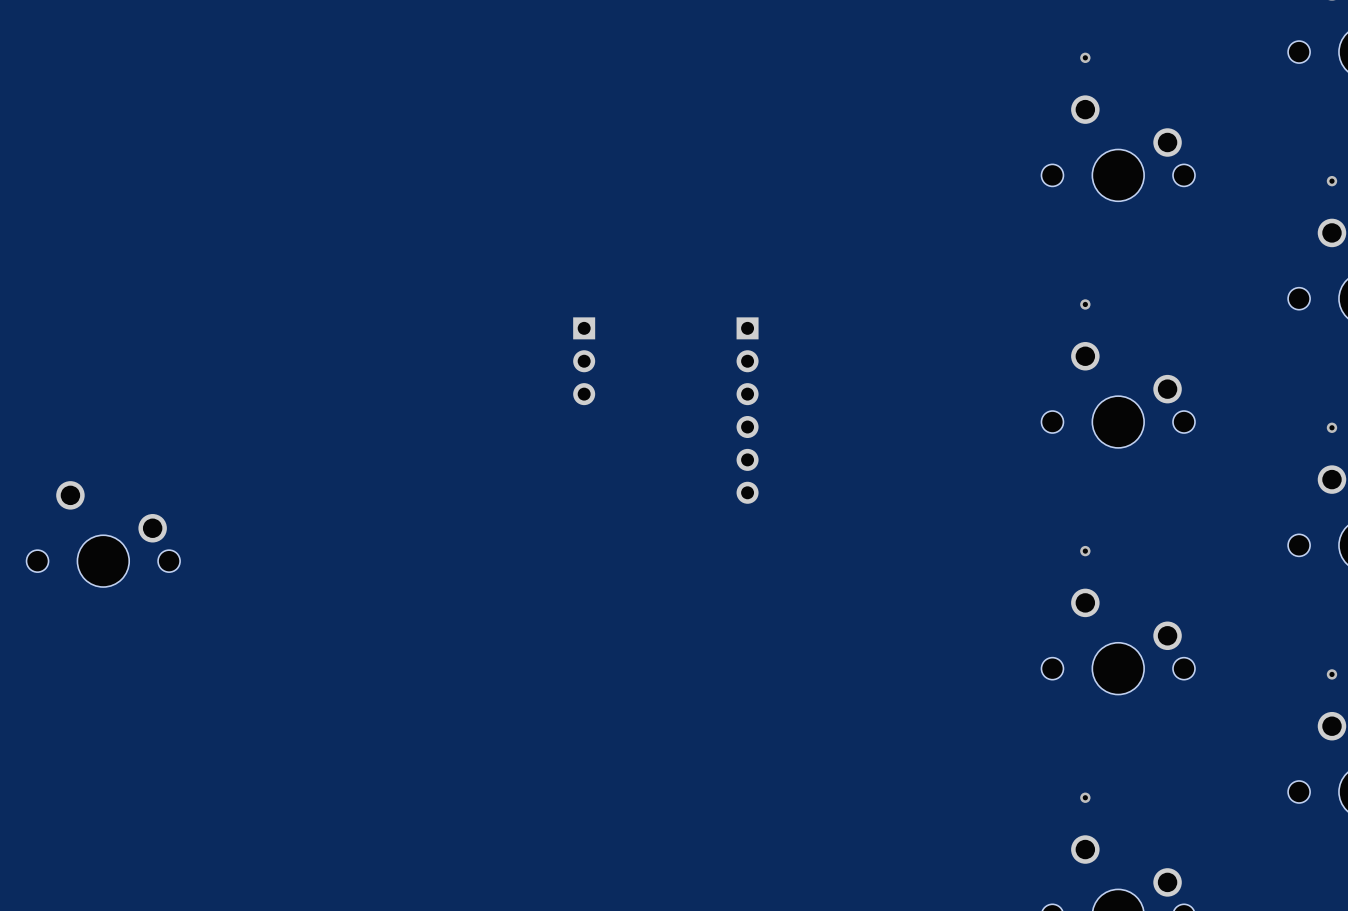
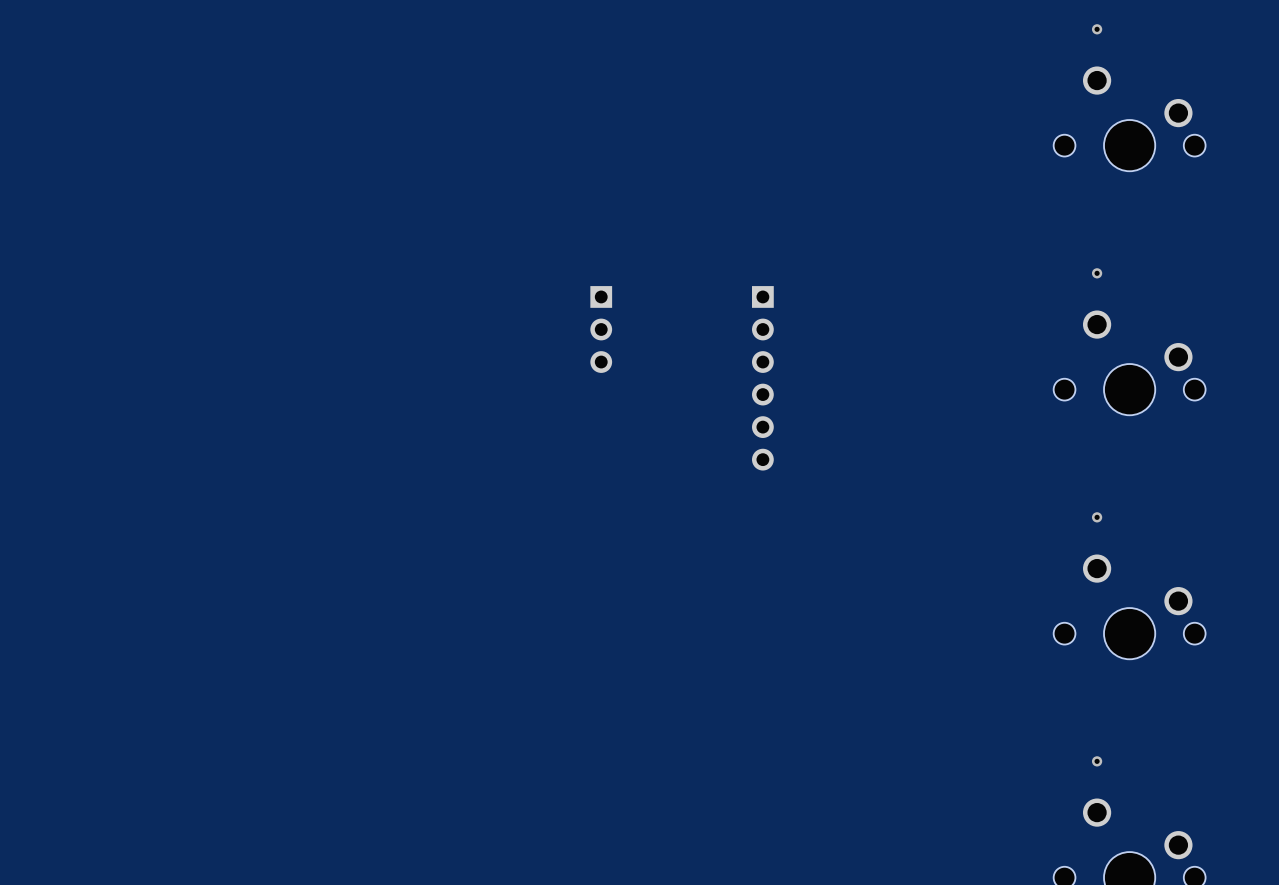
part: (103, 534) -> none

